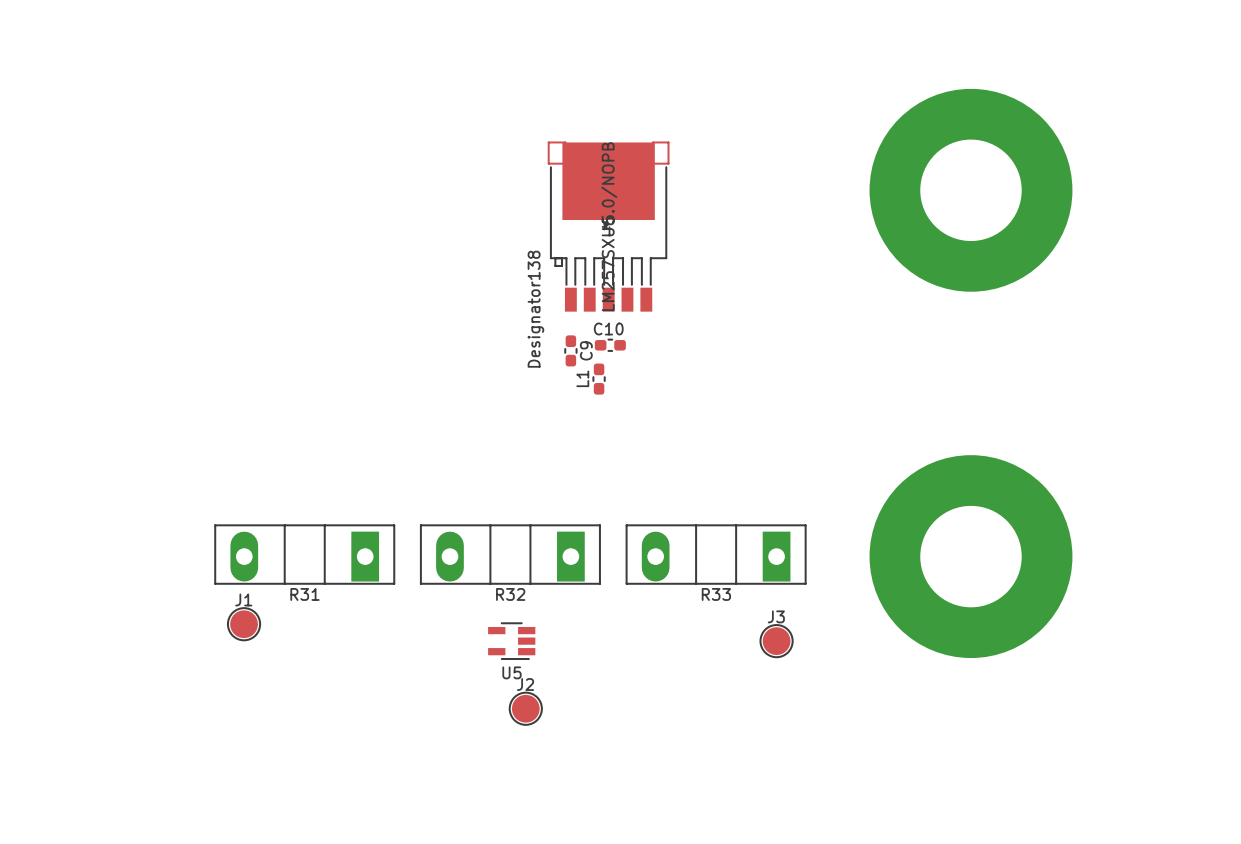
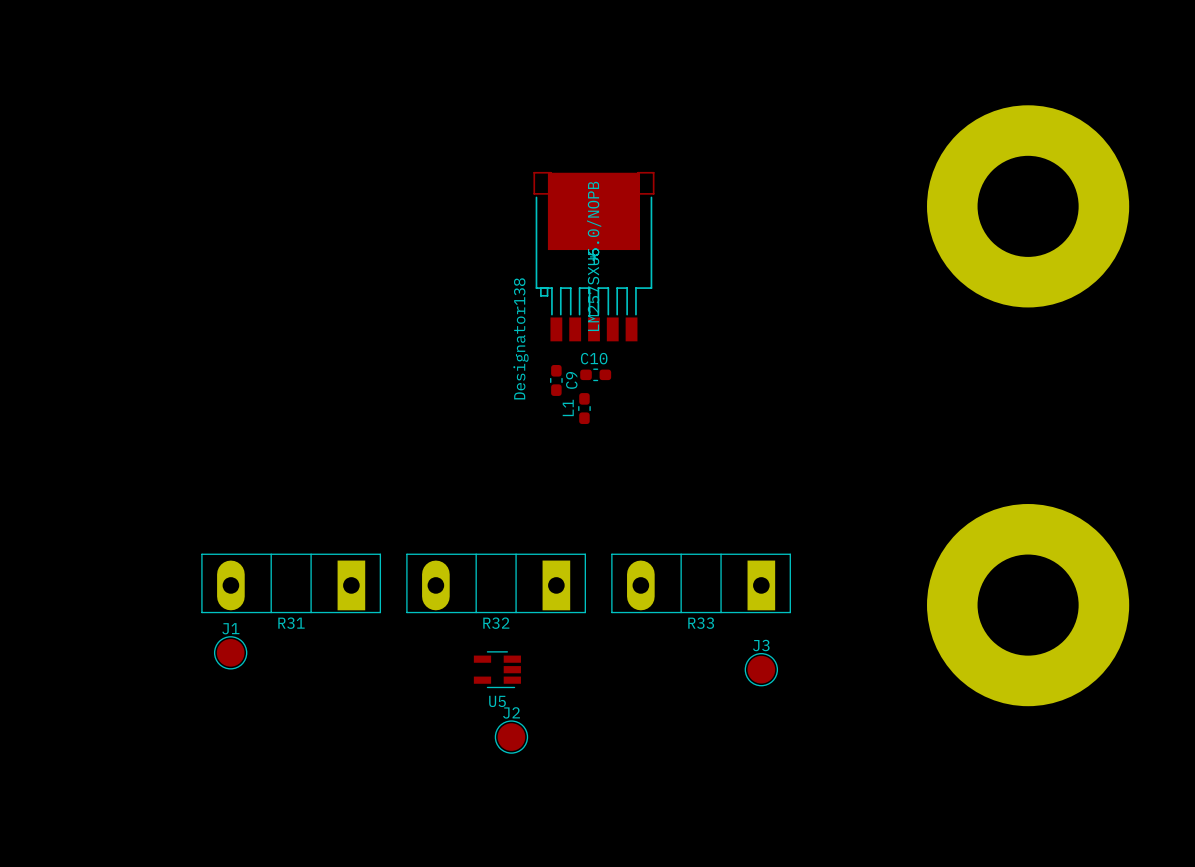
part position: (970, 190) -> (1028, 206)
part position: (970, 556) -> (1028, 605)

